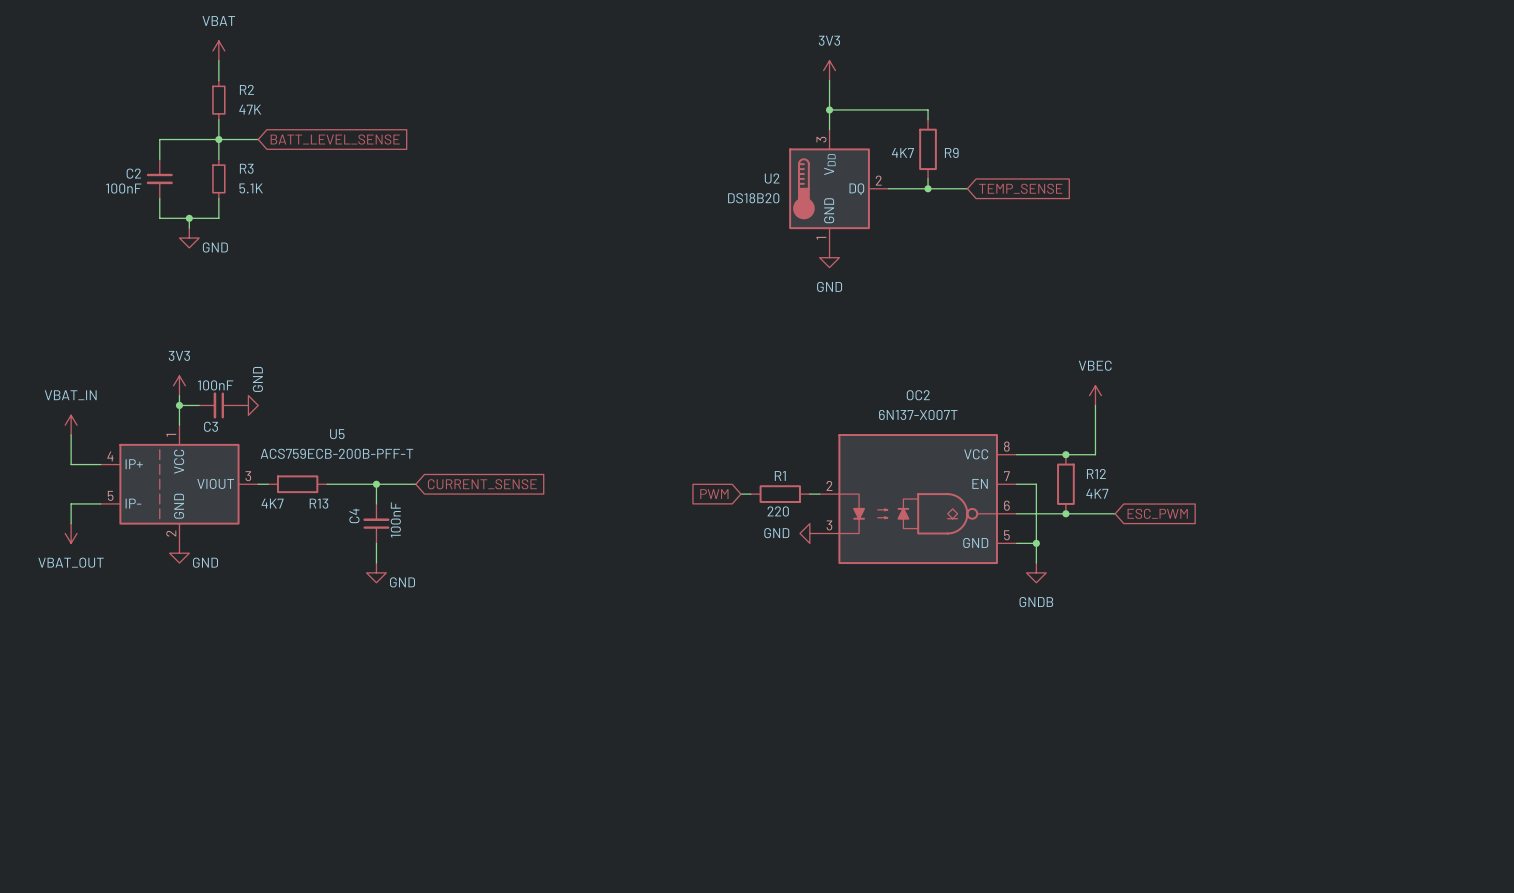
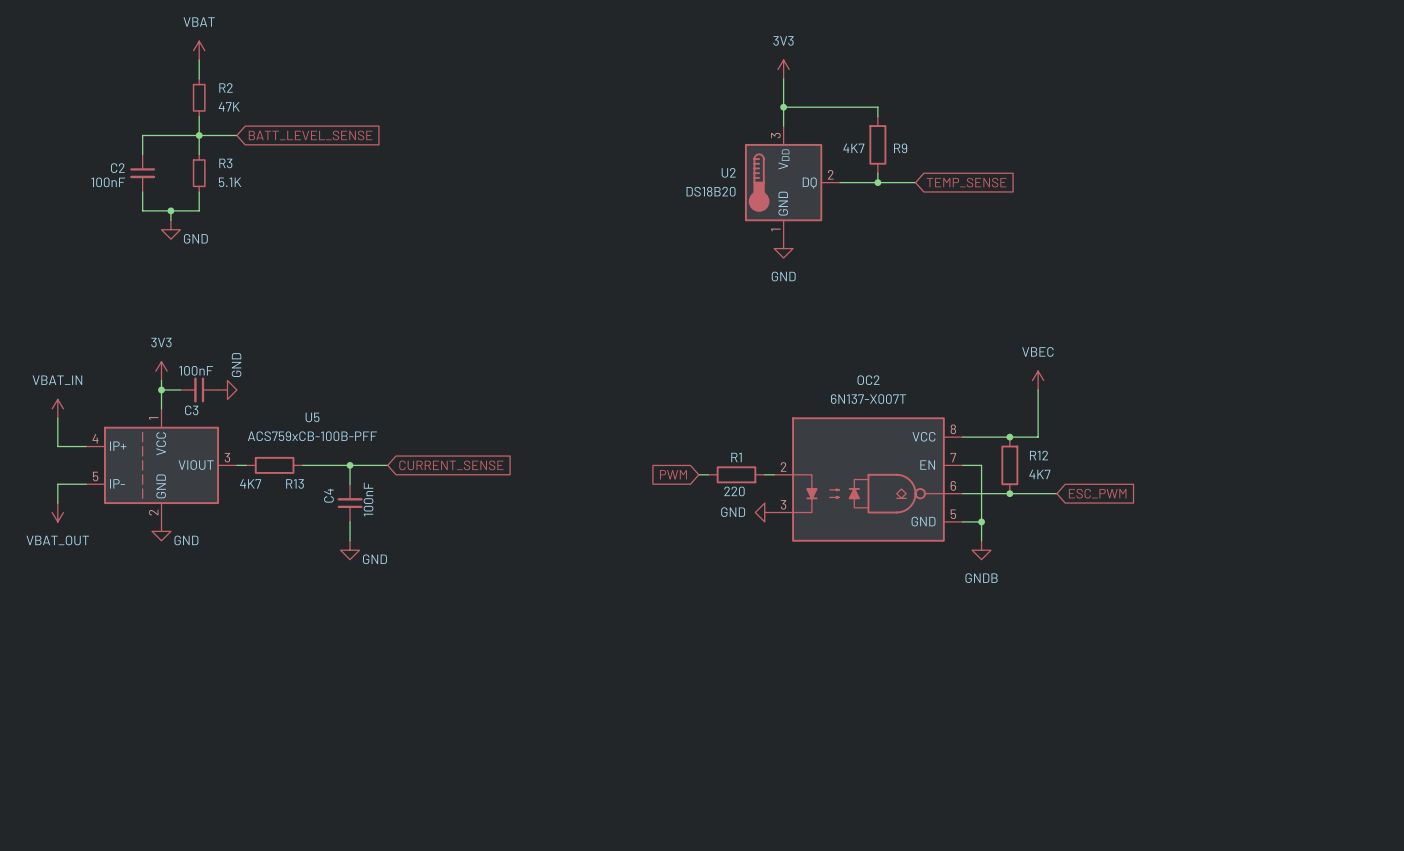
U5 value: ACS759ECB-200B-PFF-T (336, 453) -> ACS759xCB-100B-PFF (312, 436)

